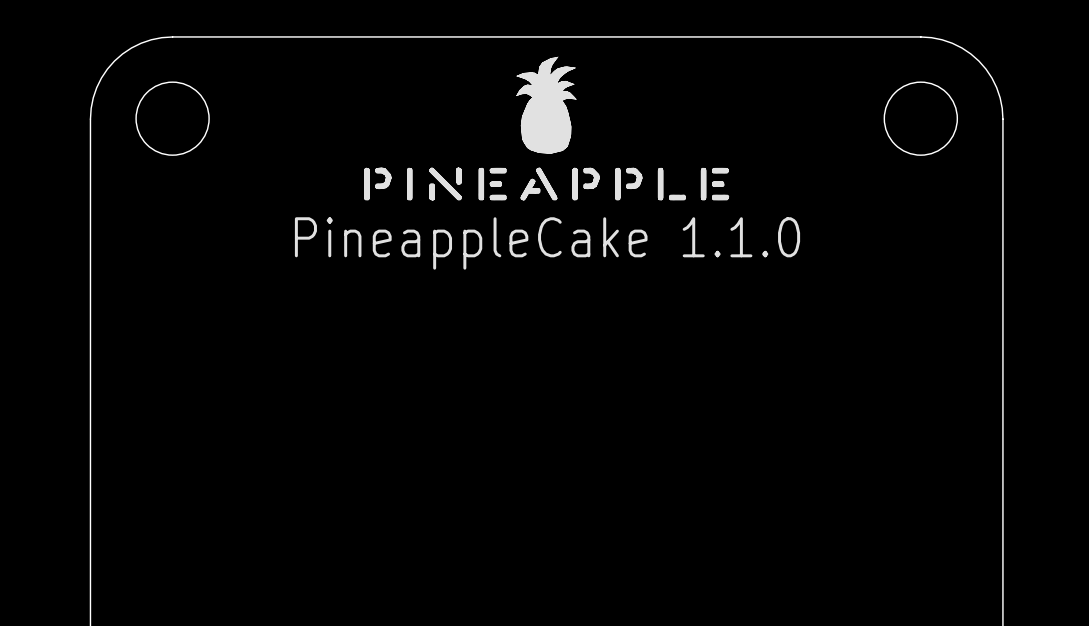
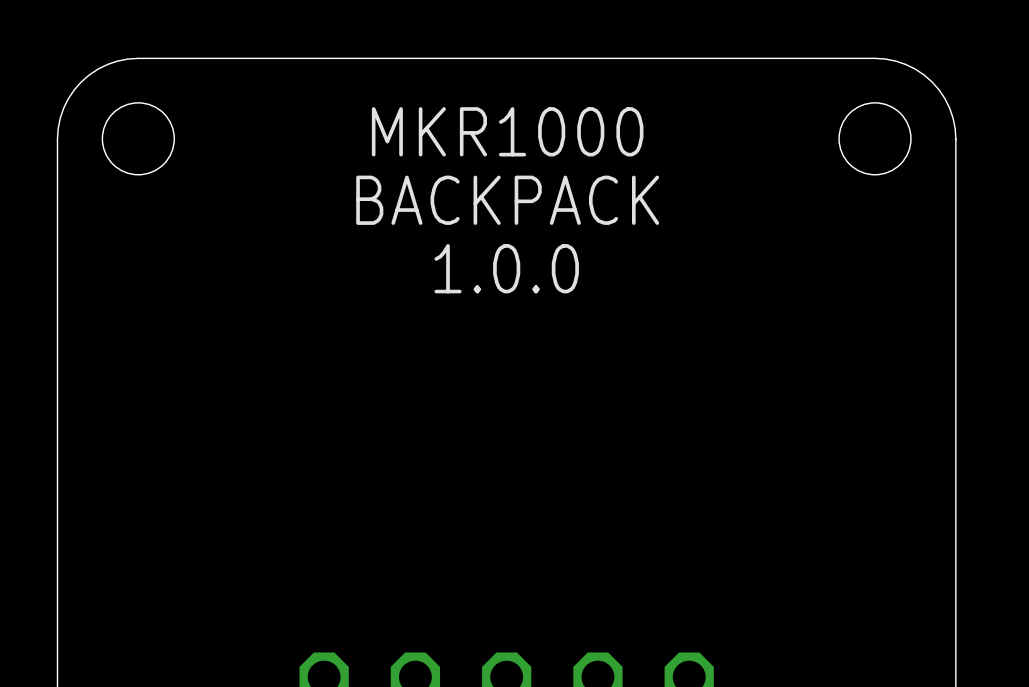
drawing: [364, 56, 730, 201] -> none
text: none -> MKR1000 (507, 131)
text: none -> BACKPACK (507, 200)
text: PineappleCake 1.1.0 (547, 243) -> none
text: none -> 1.0.0 (506, 268)

